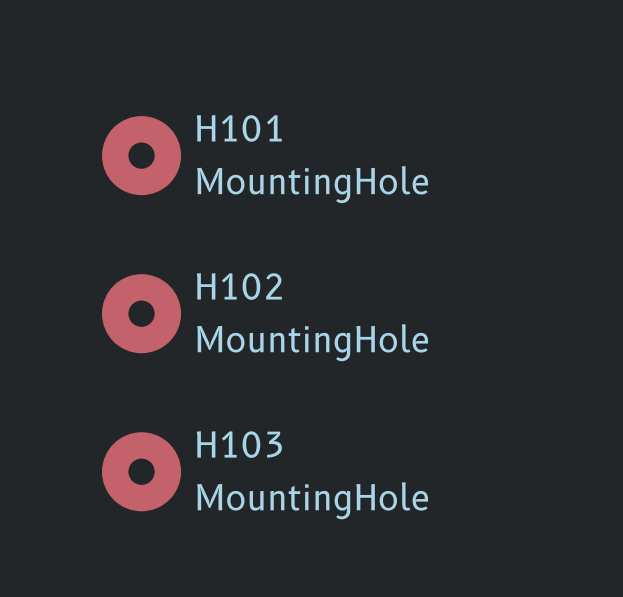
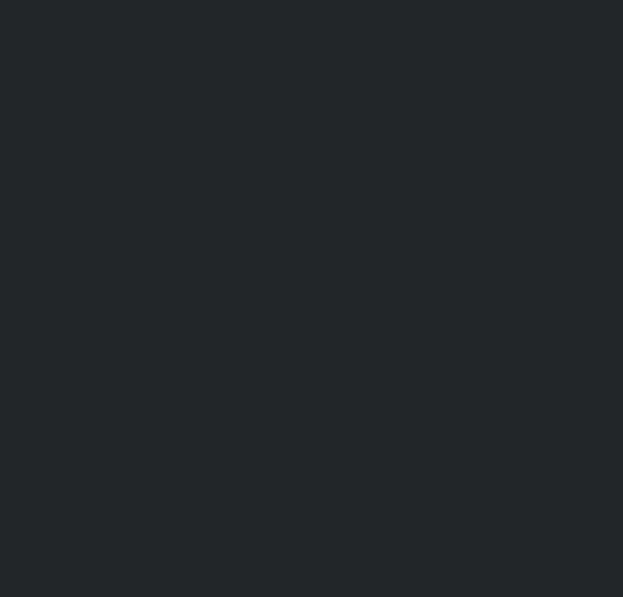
H101: MountingHole (141, 155) -> none
H102: MountingHole (141, 313) -> none
H103: MountingHole (141, 471) -> none

